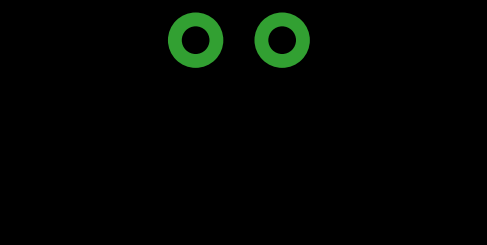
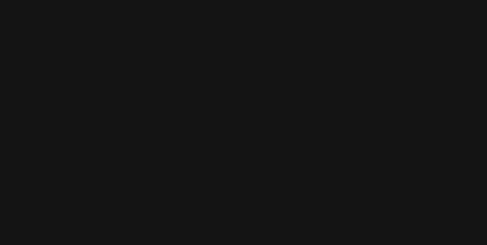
part: (238, 40) -> none

